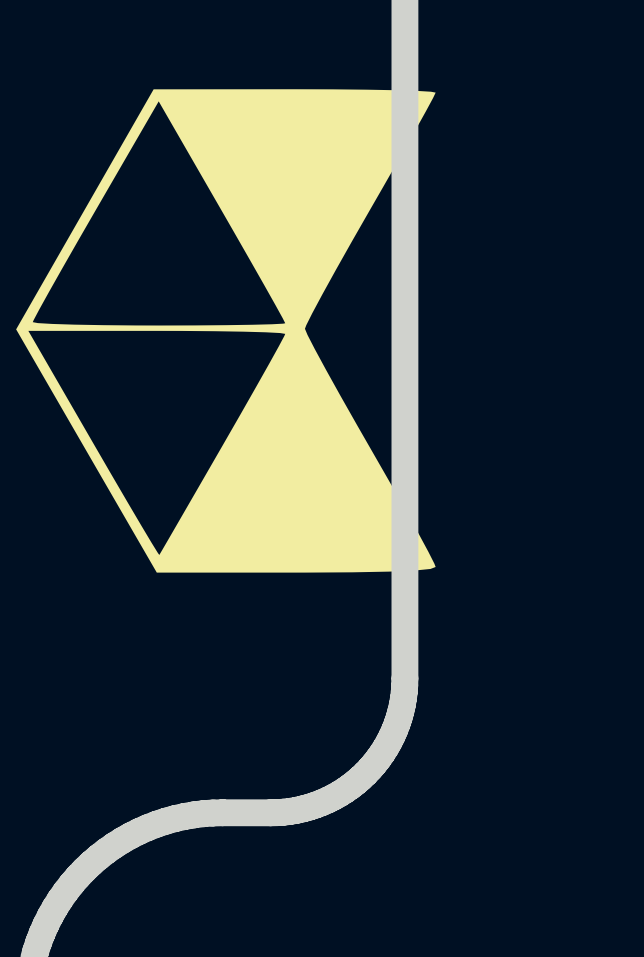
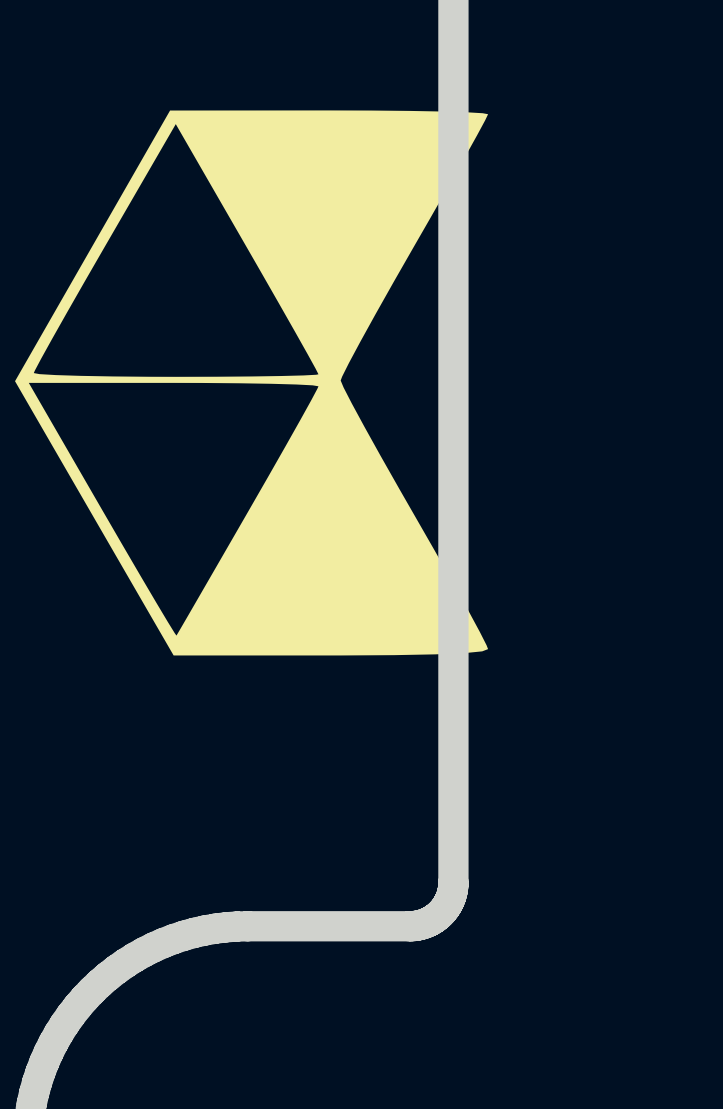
board edge: (404, 678) (400, 711) (389, 741) (370, 768) (350, 786) (327, 799) (296, 810) (277, 812) (222, 812) -> (453, 774) (453, 886) (447, 904) (435, 917) (424, 923) (411, 926) (247, 926)

